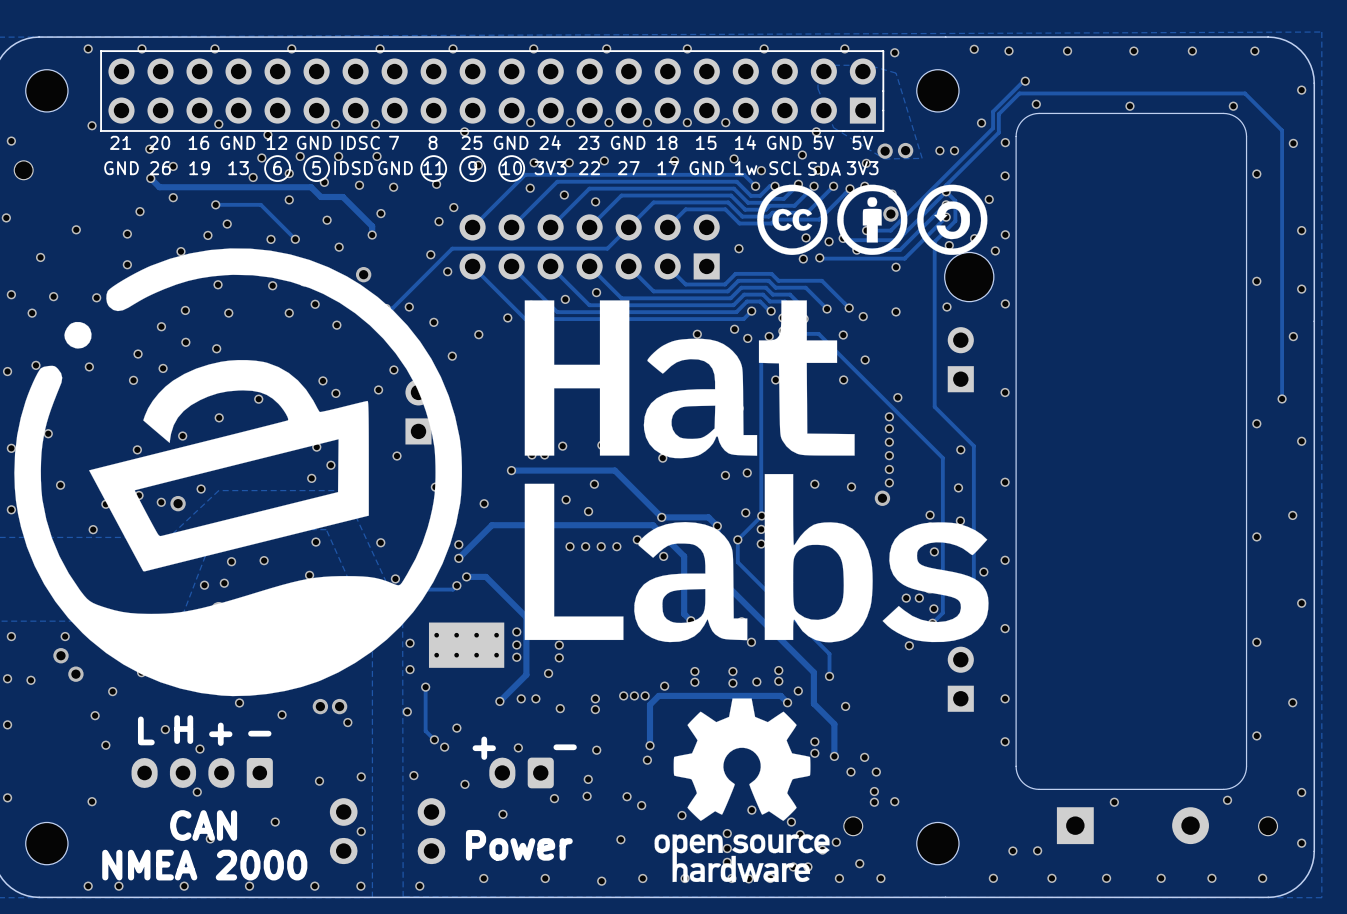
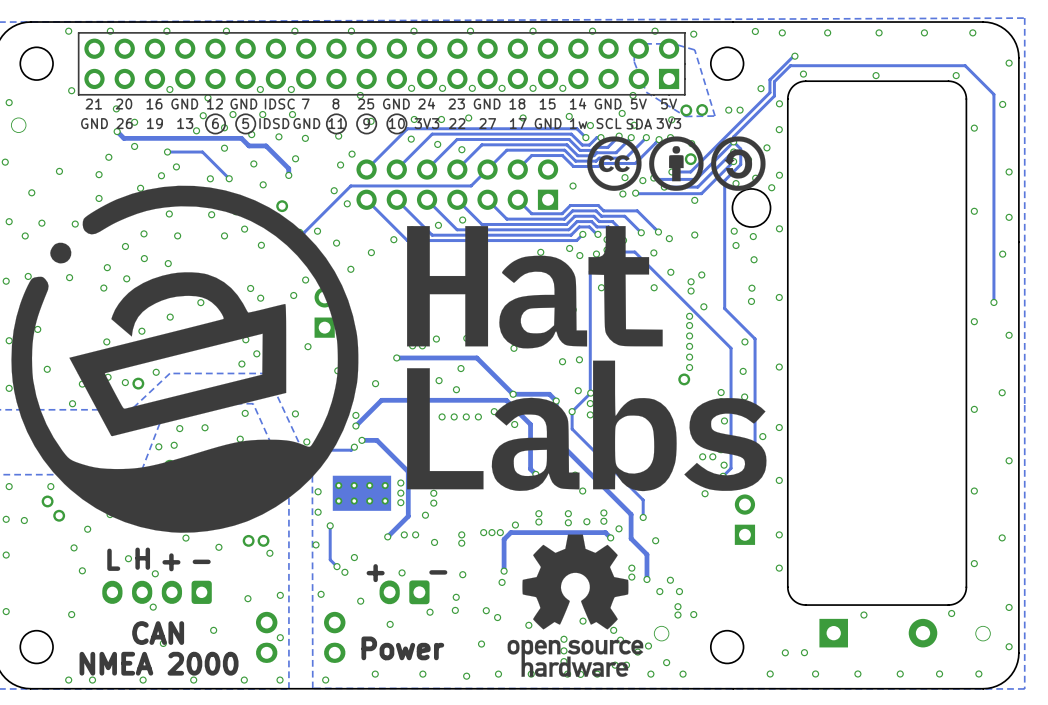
via: none -> (753, 236)
via: none -> (736, 245)
via: none -> (754, 259)
part: (960, 359) -> none
via: none -> (701, 274)
via: none -> (691, 281)
via: none -> (751, 288)
via: none -> (691, 291)
via: (897, 397) -> none
via: none -> (751, 301)
via: none -> (703, 306)
via: (814, 484) -> none
via: (851, 486) -> none

